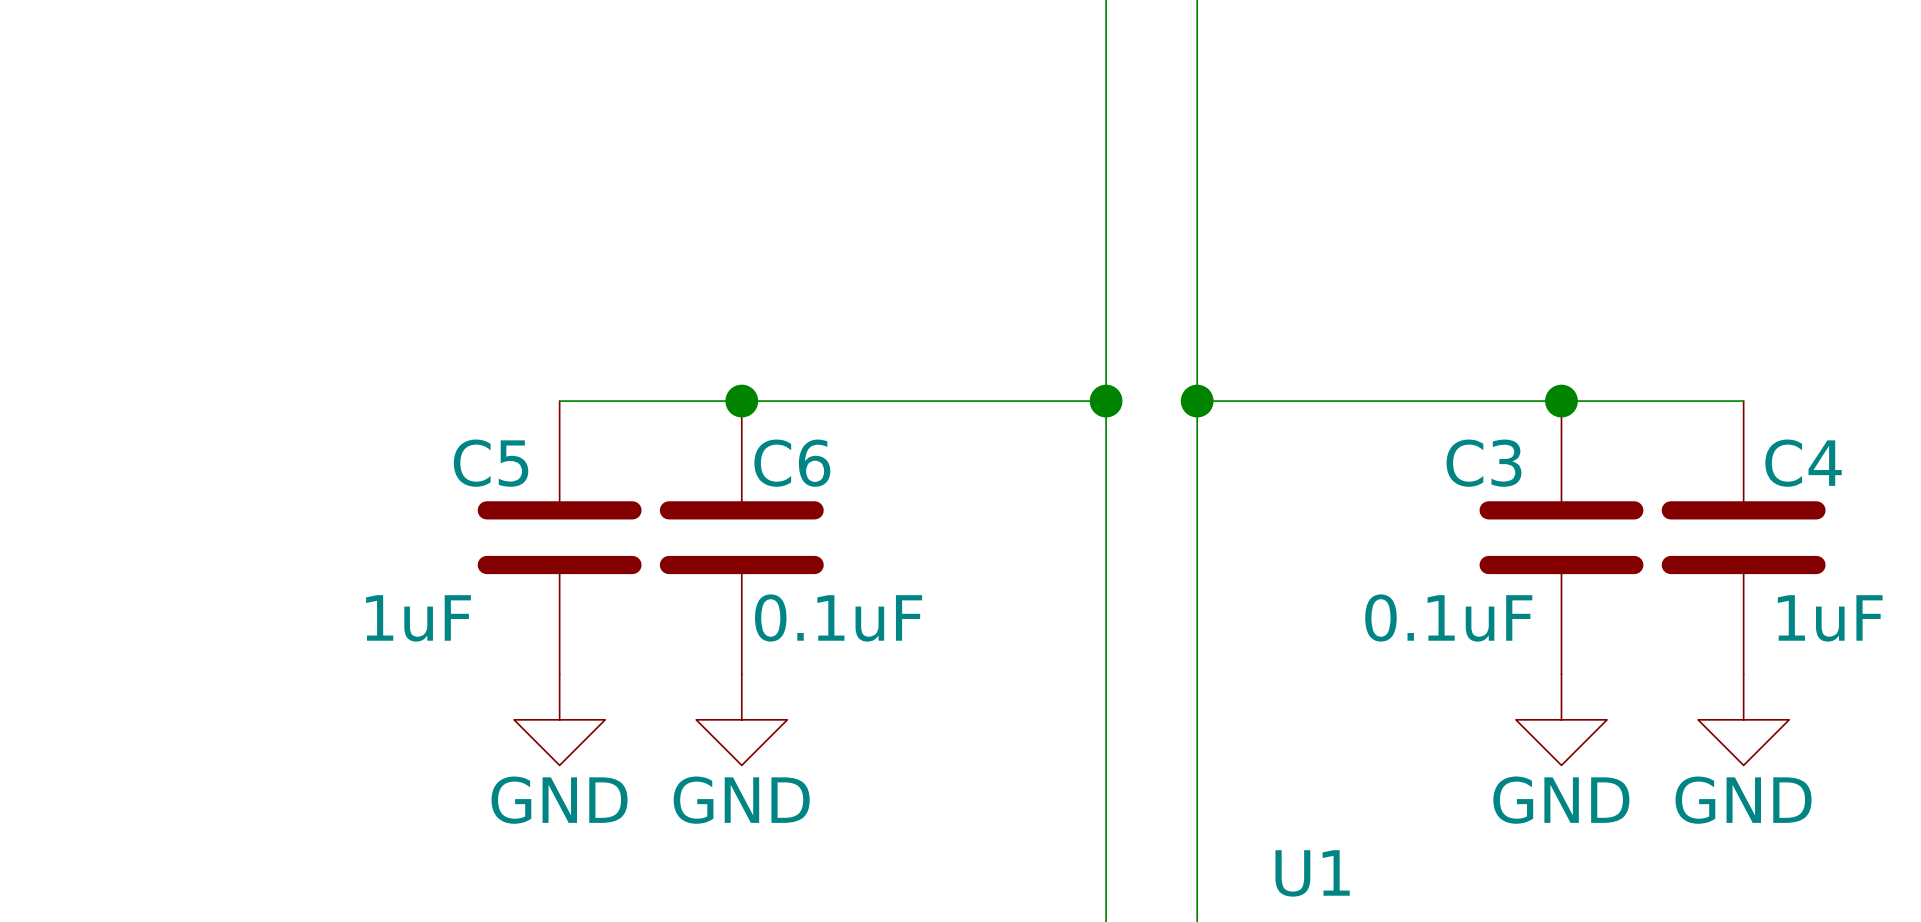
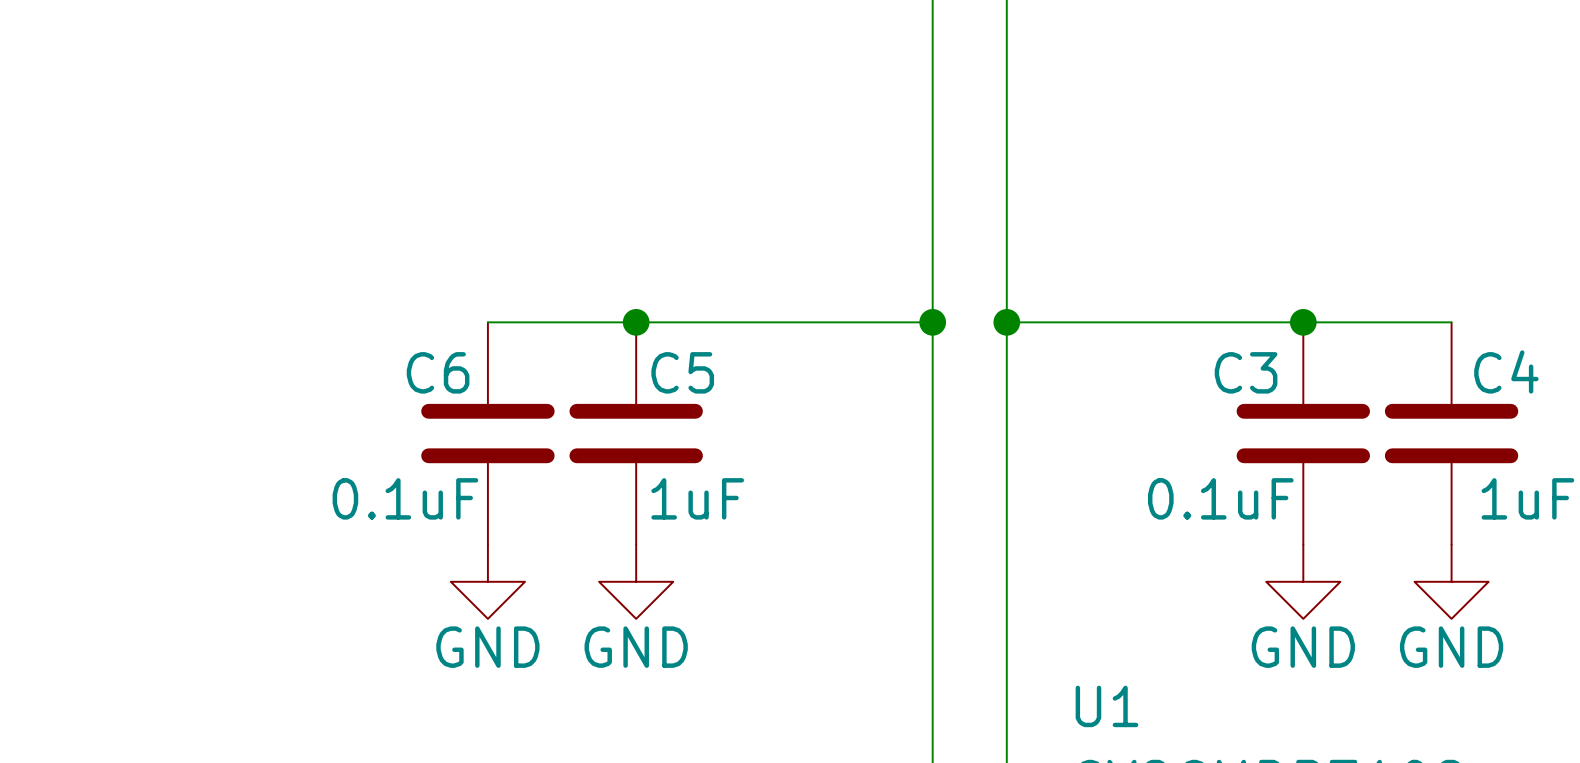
C5 name: C5 (491, 463) -> C6 (438, 372)
C6 name: C6 (792, 463) -> C5 (682, 372)
C5 value: 0.1uF (838, 617) -> 1uF (697, 498)
C6 value: 1uF (418, 618) -> 0.1uF (405, 498)

